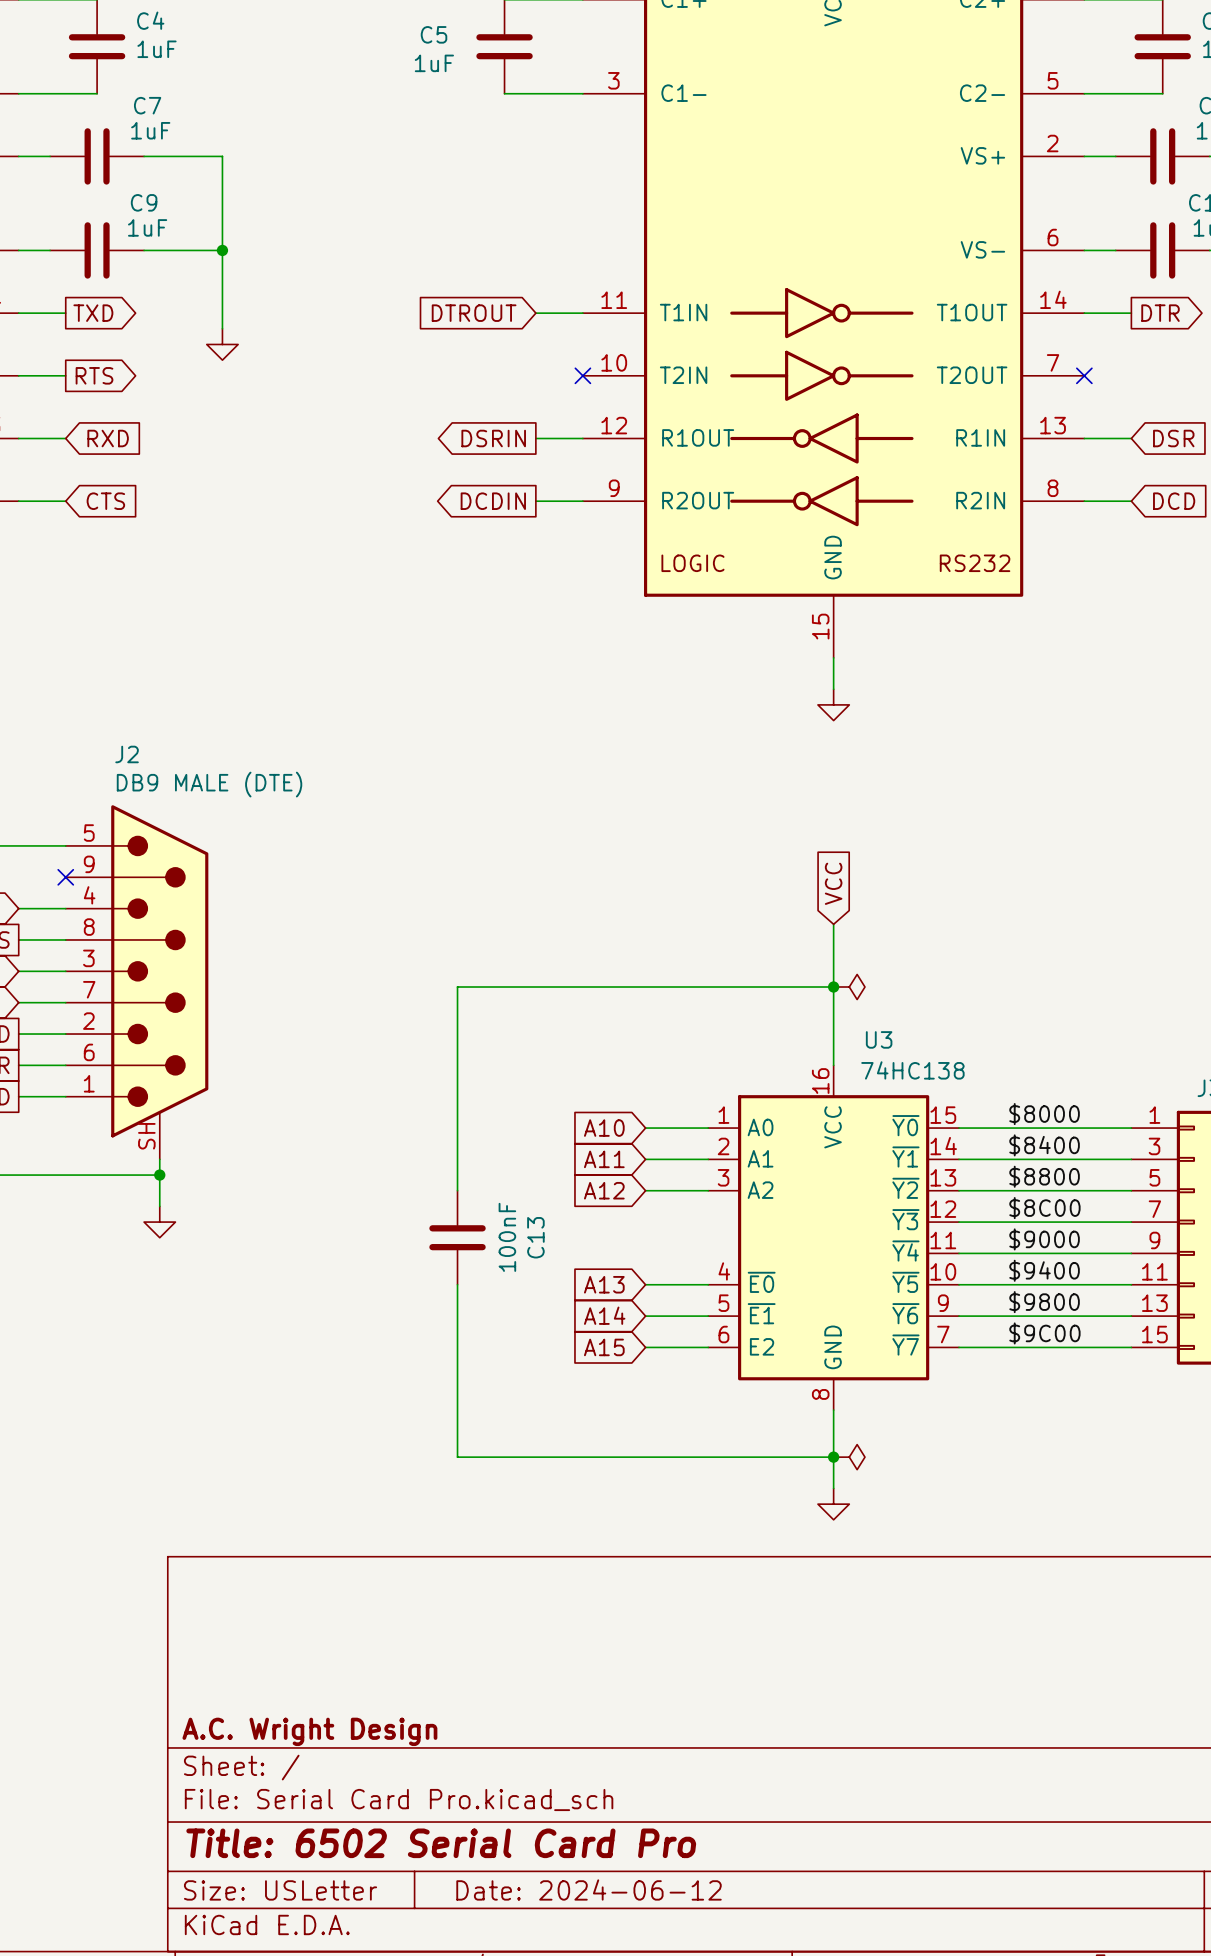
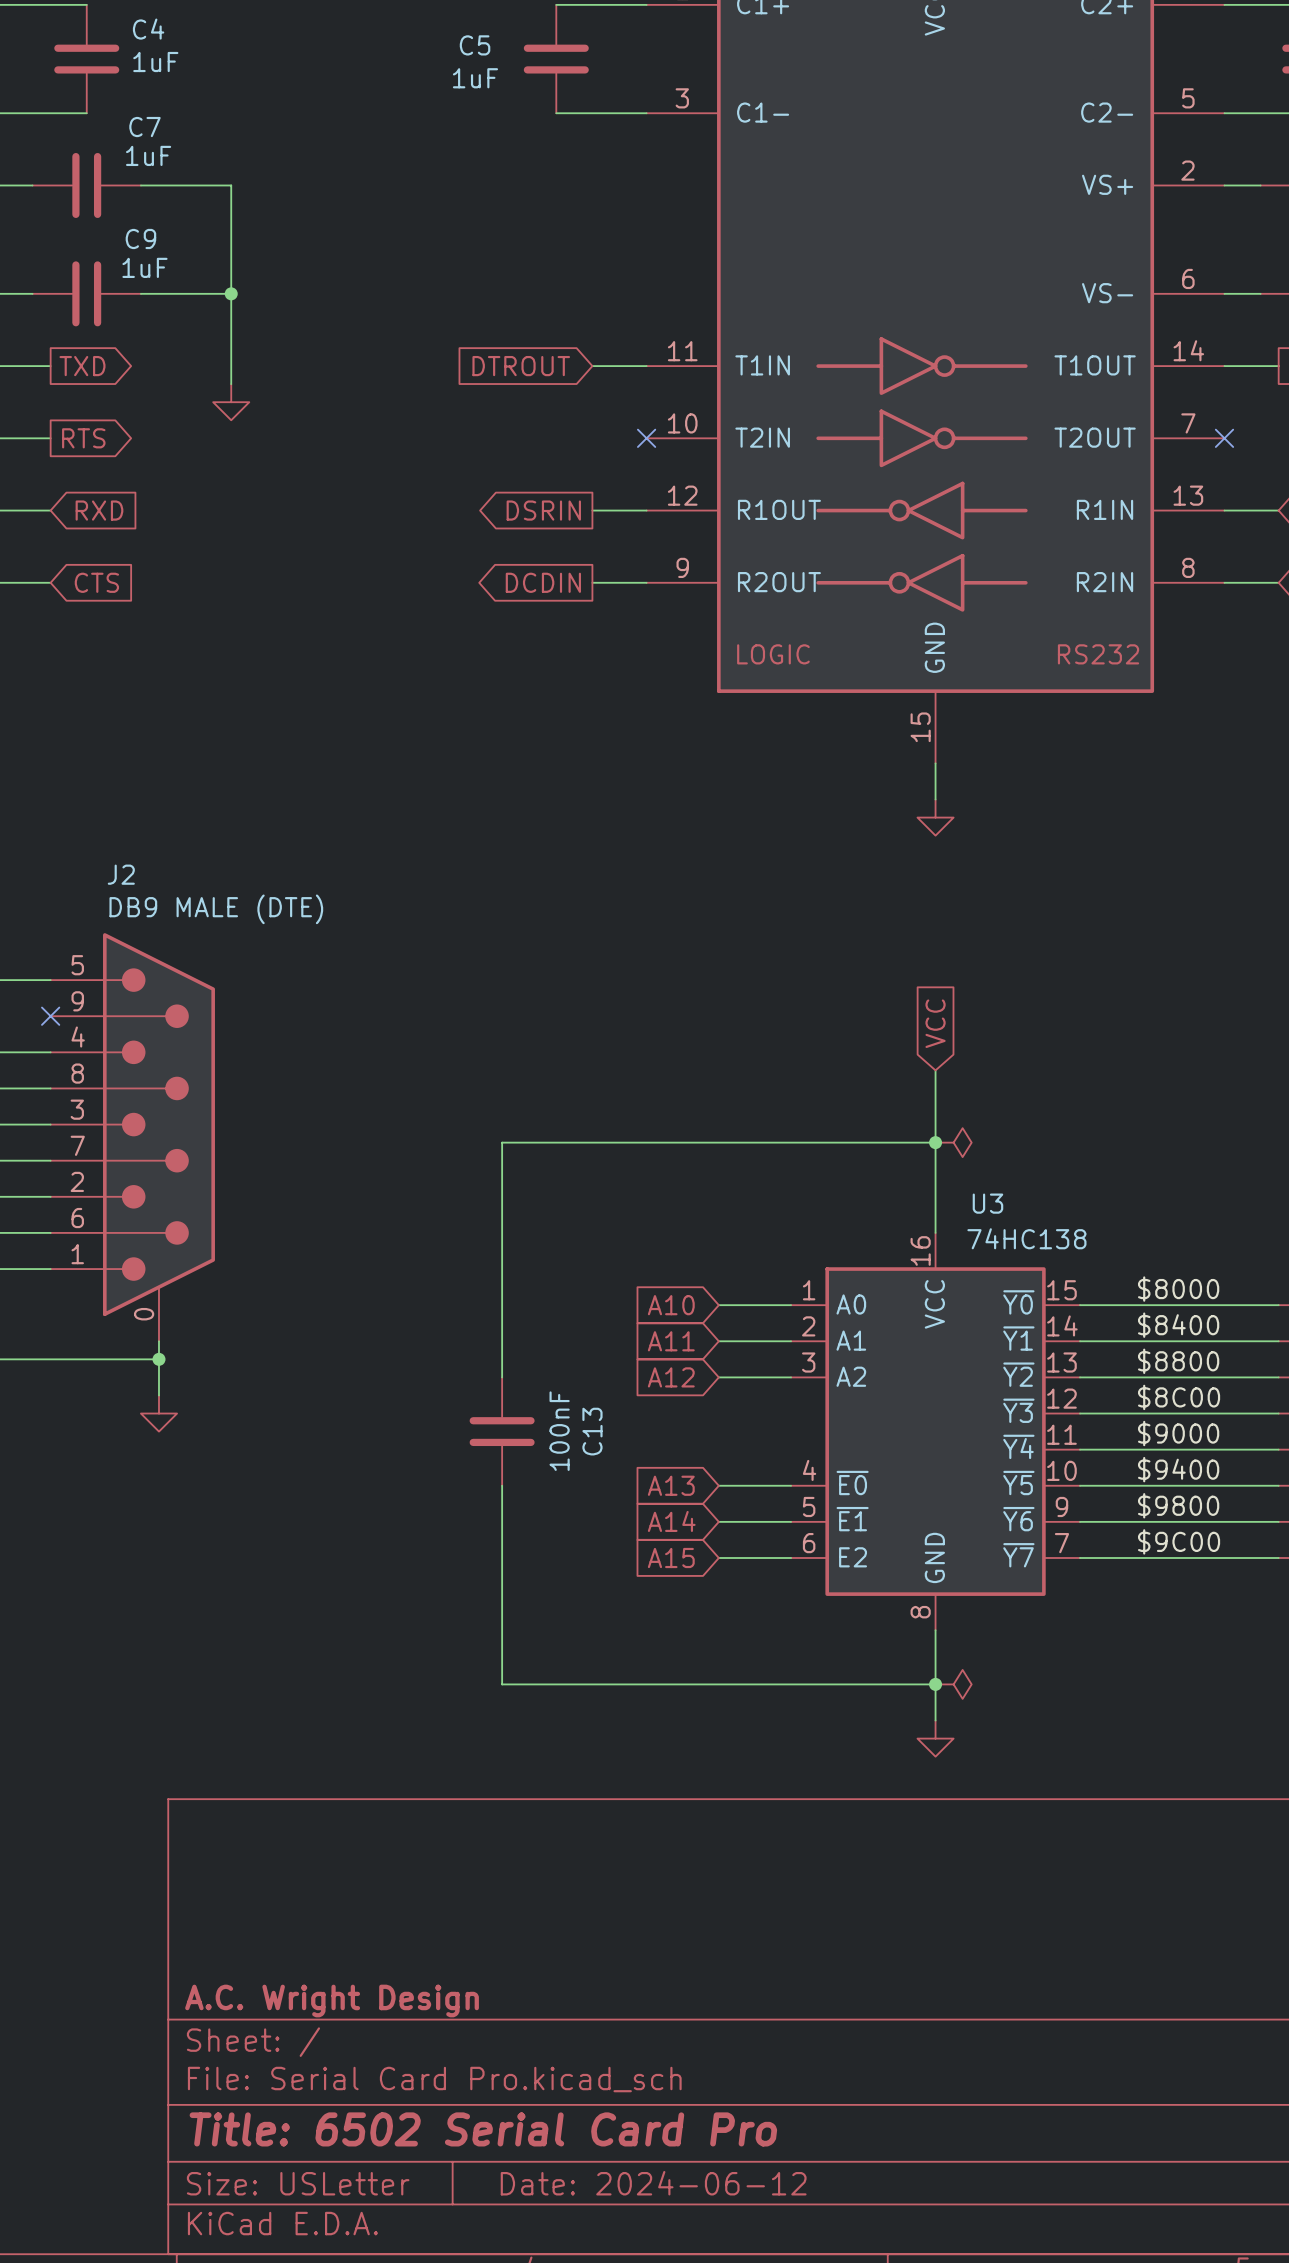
J2 pin number: SH (146, 1136) -> 0 (144, 1314)

